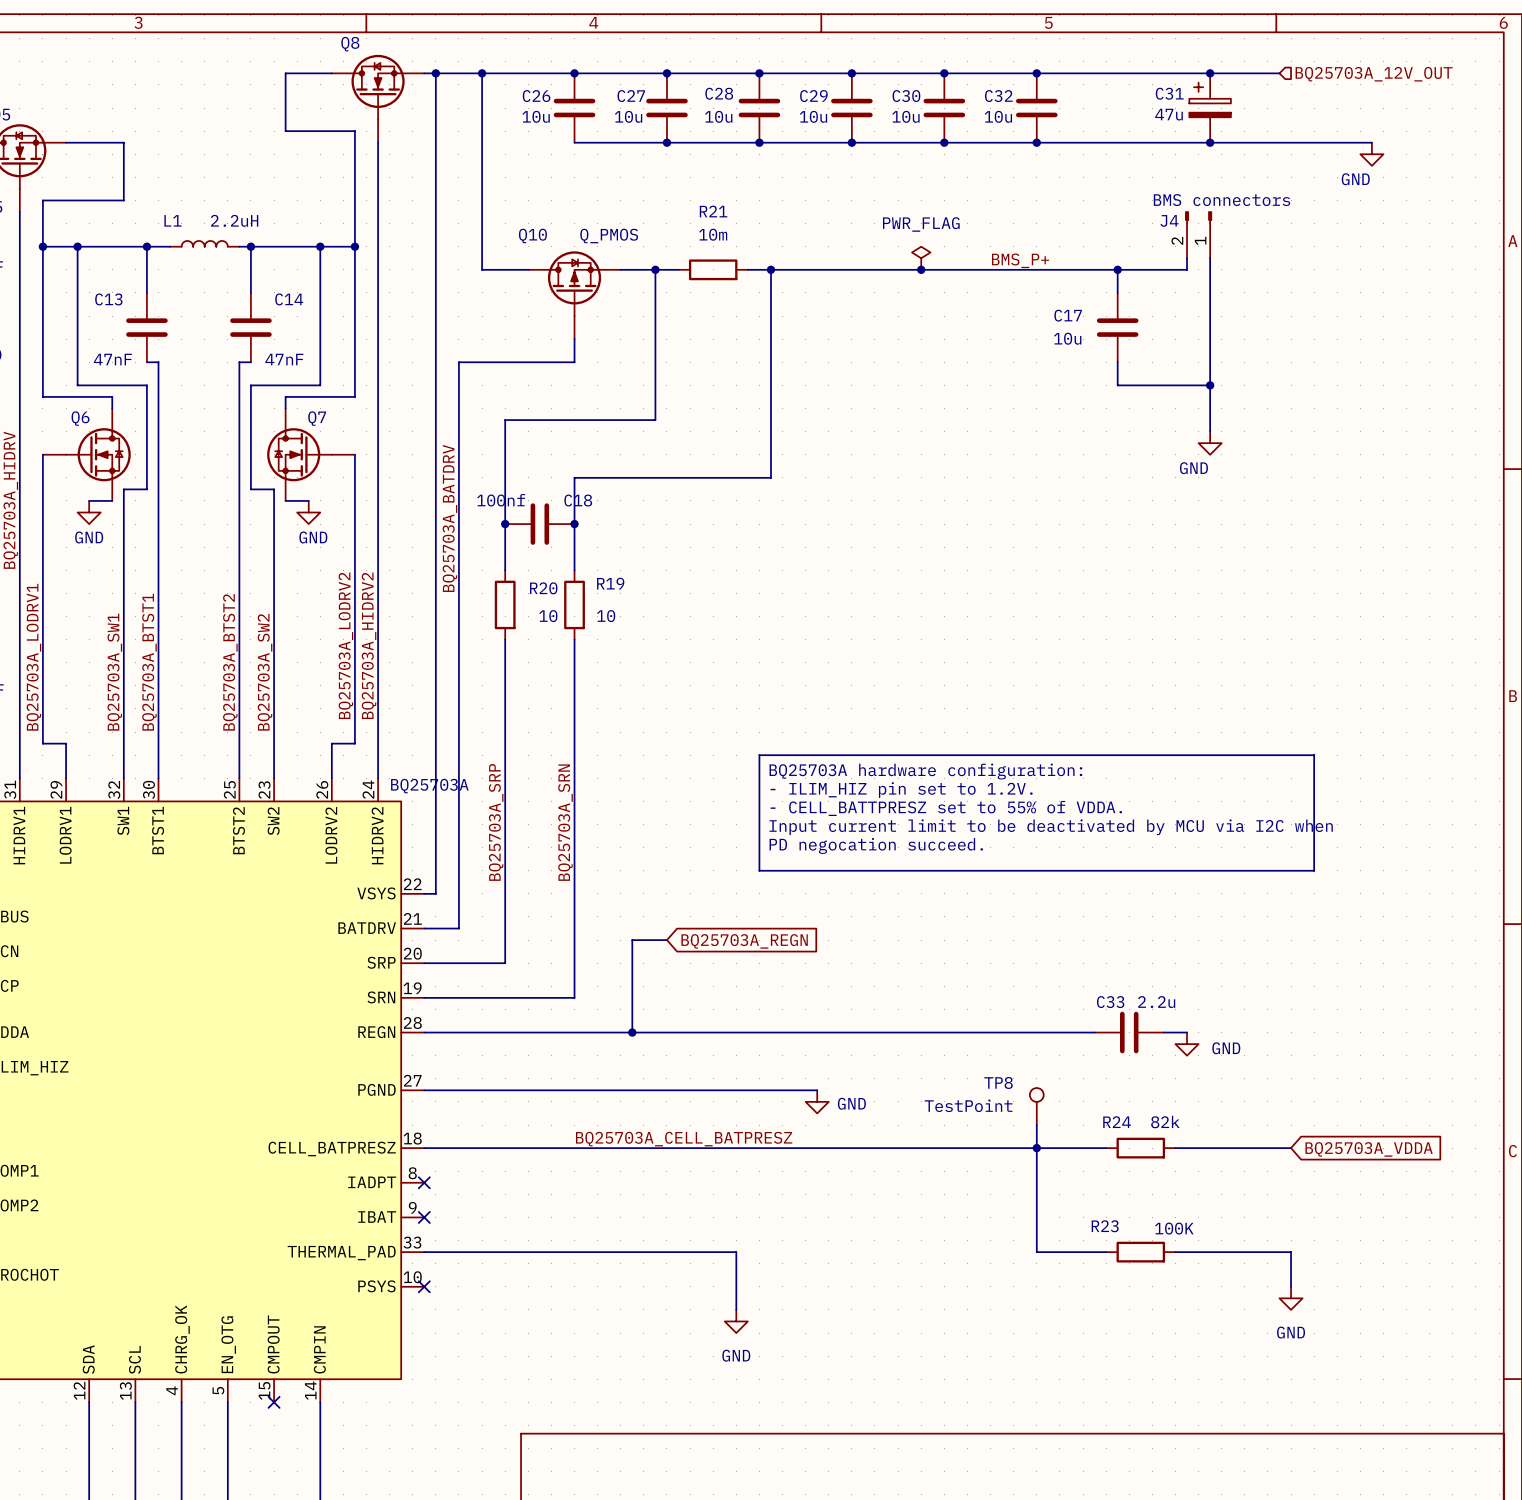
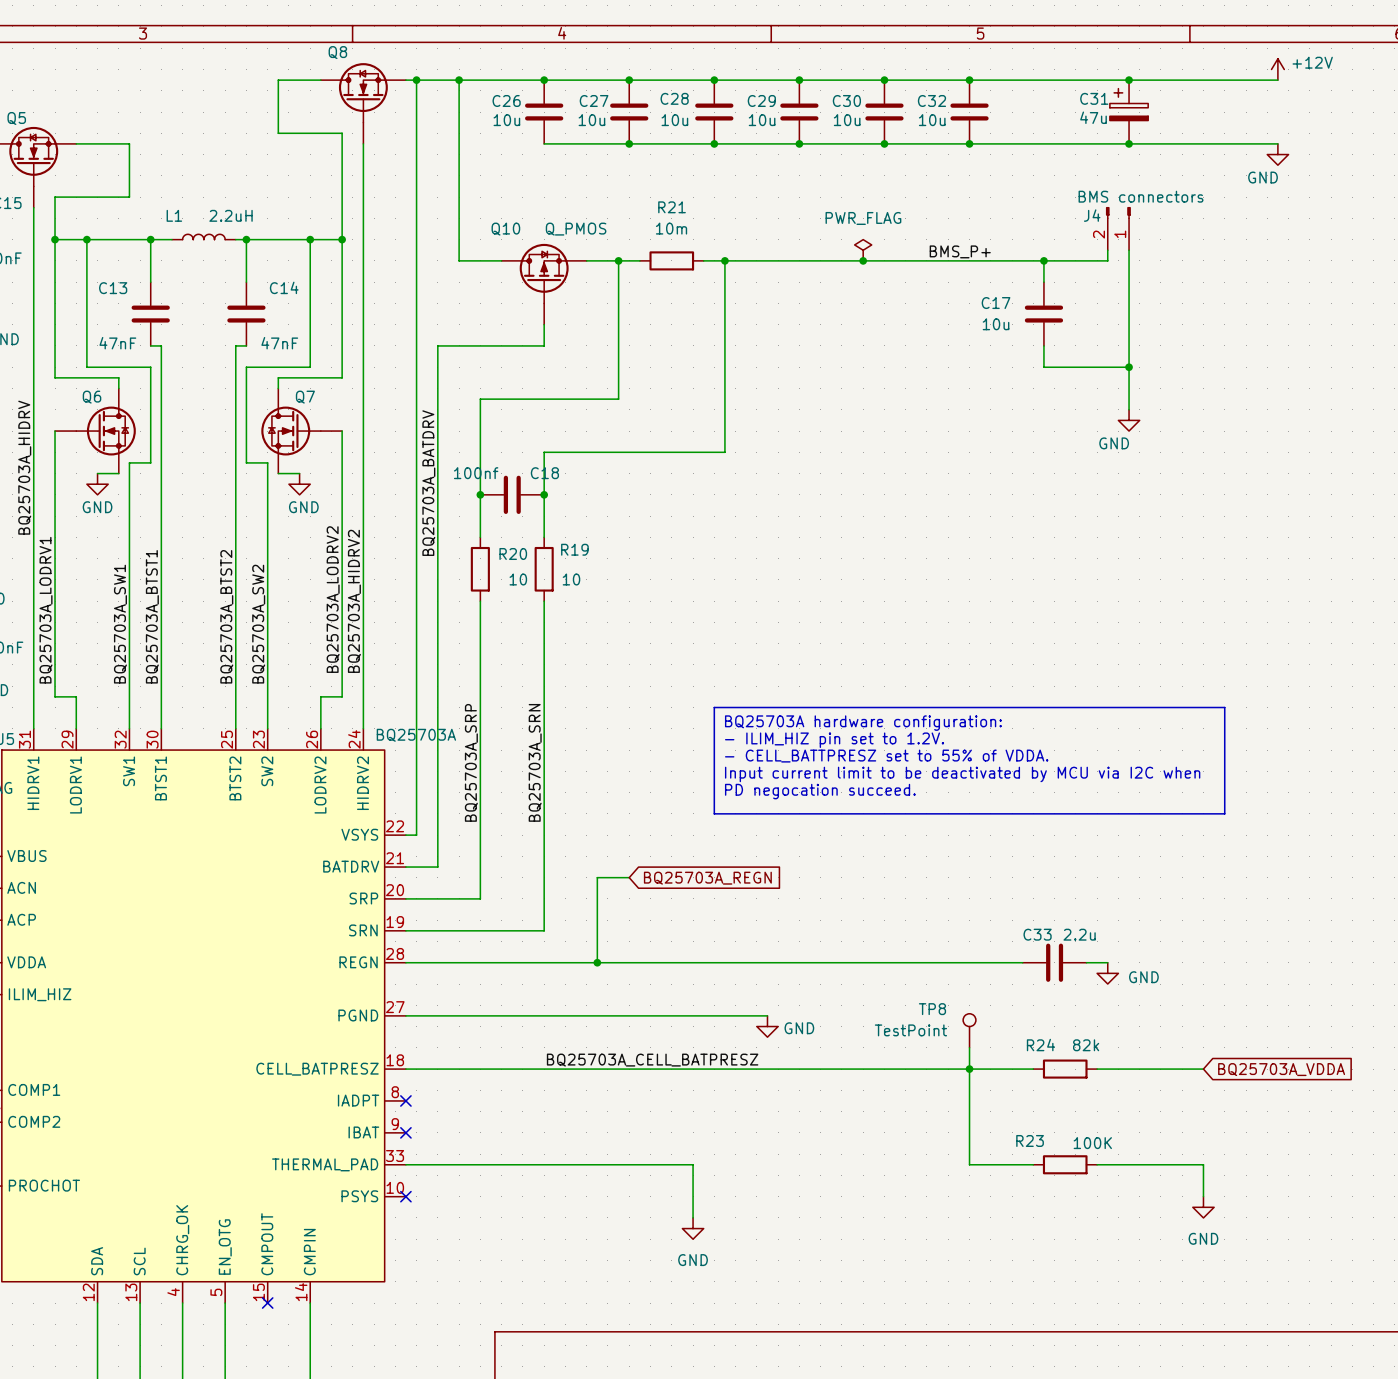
power symbol: none -> +12V (1277, 69)
wire: none -> (1192, 80) (1277, 80)
hierarchical label: BQ25703A_12V_OUT (1374, 74) -> none

